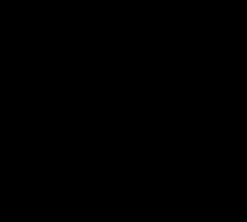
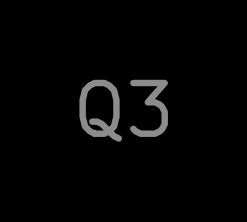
text: none -> Q3 (123, 110)

